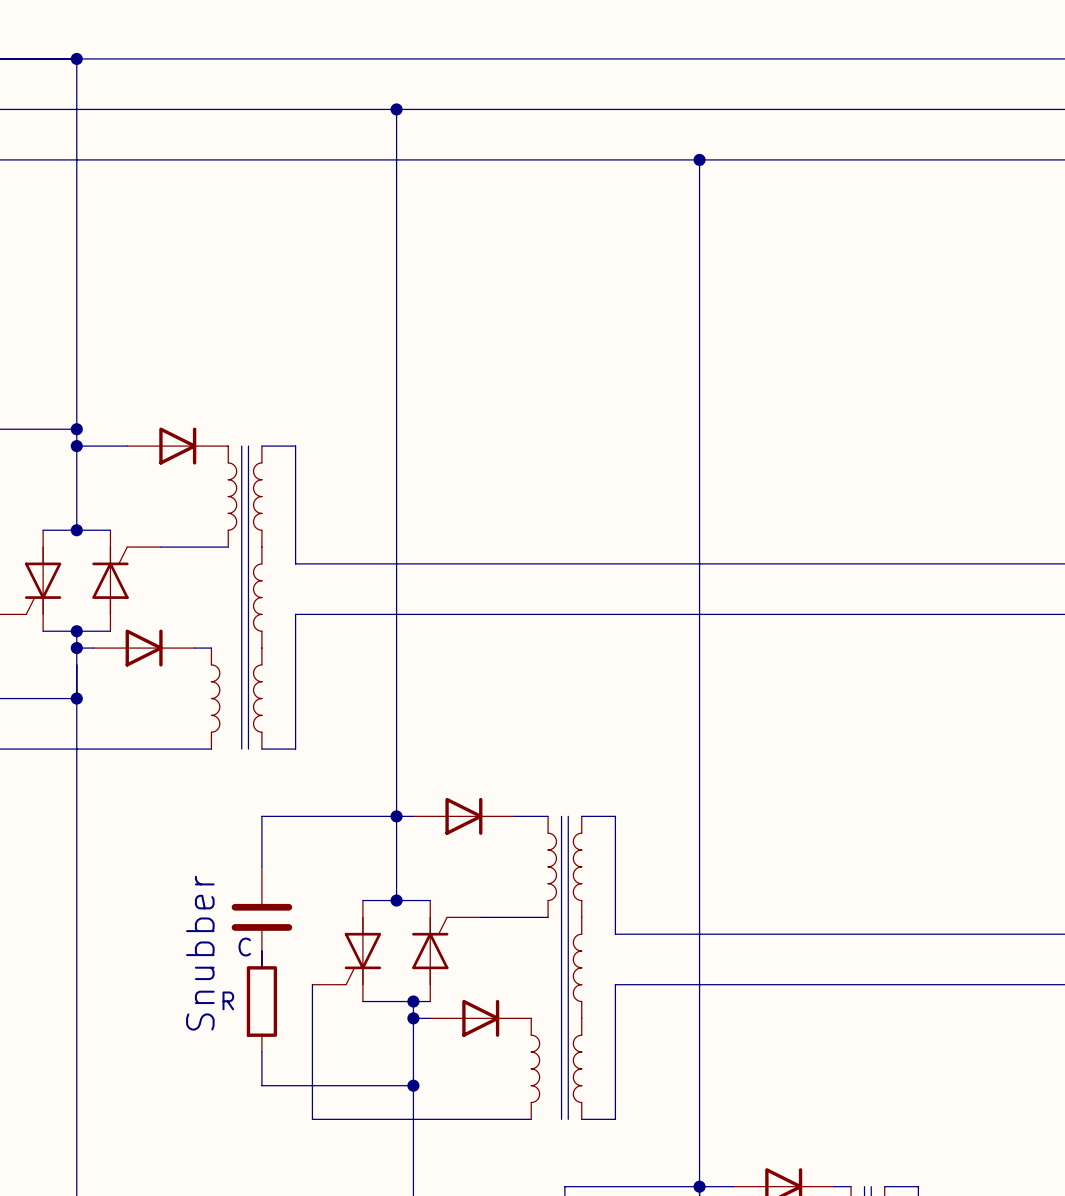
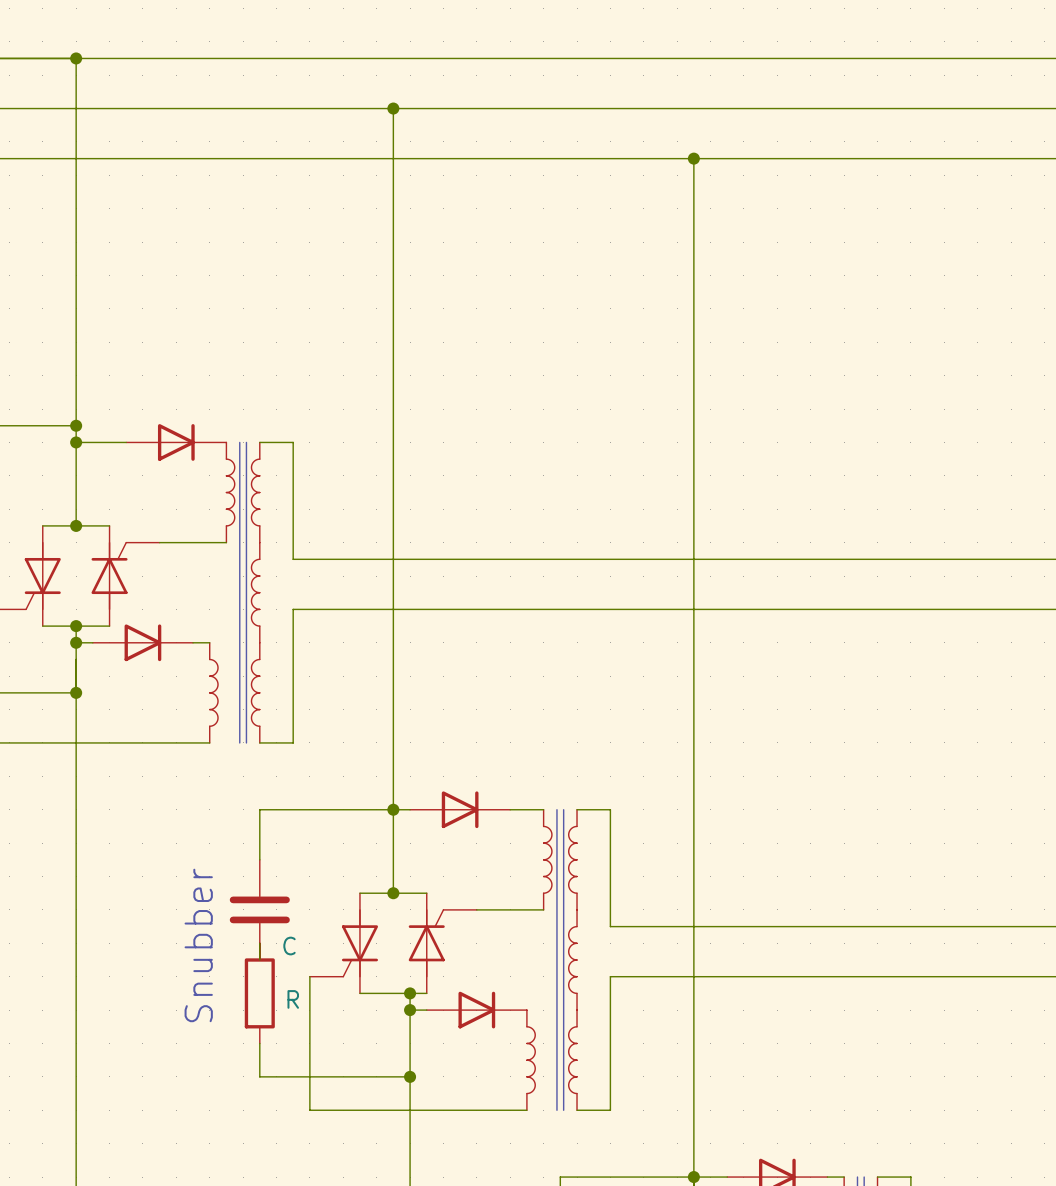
part value position: C (244, 947) -> C (289, 946)
part value position: R (228, 1000) -> R (293, 999)

